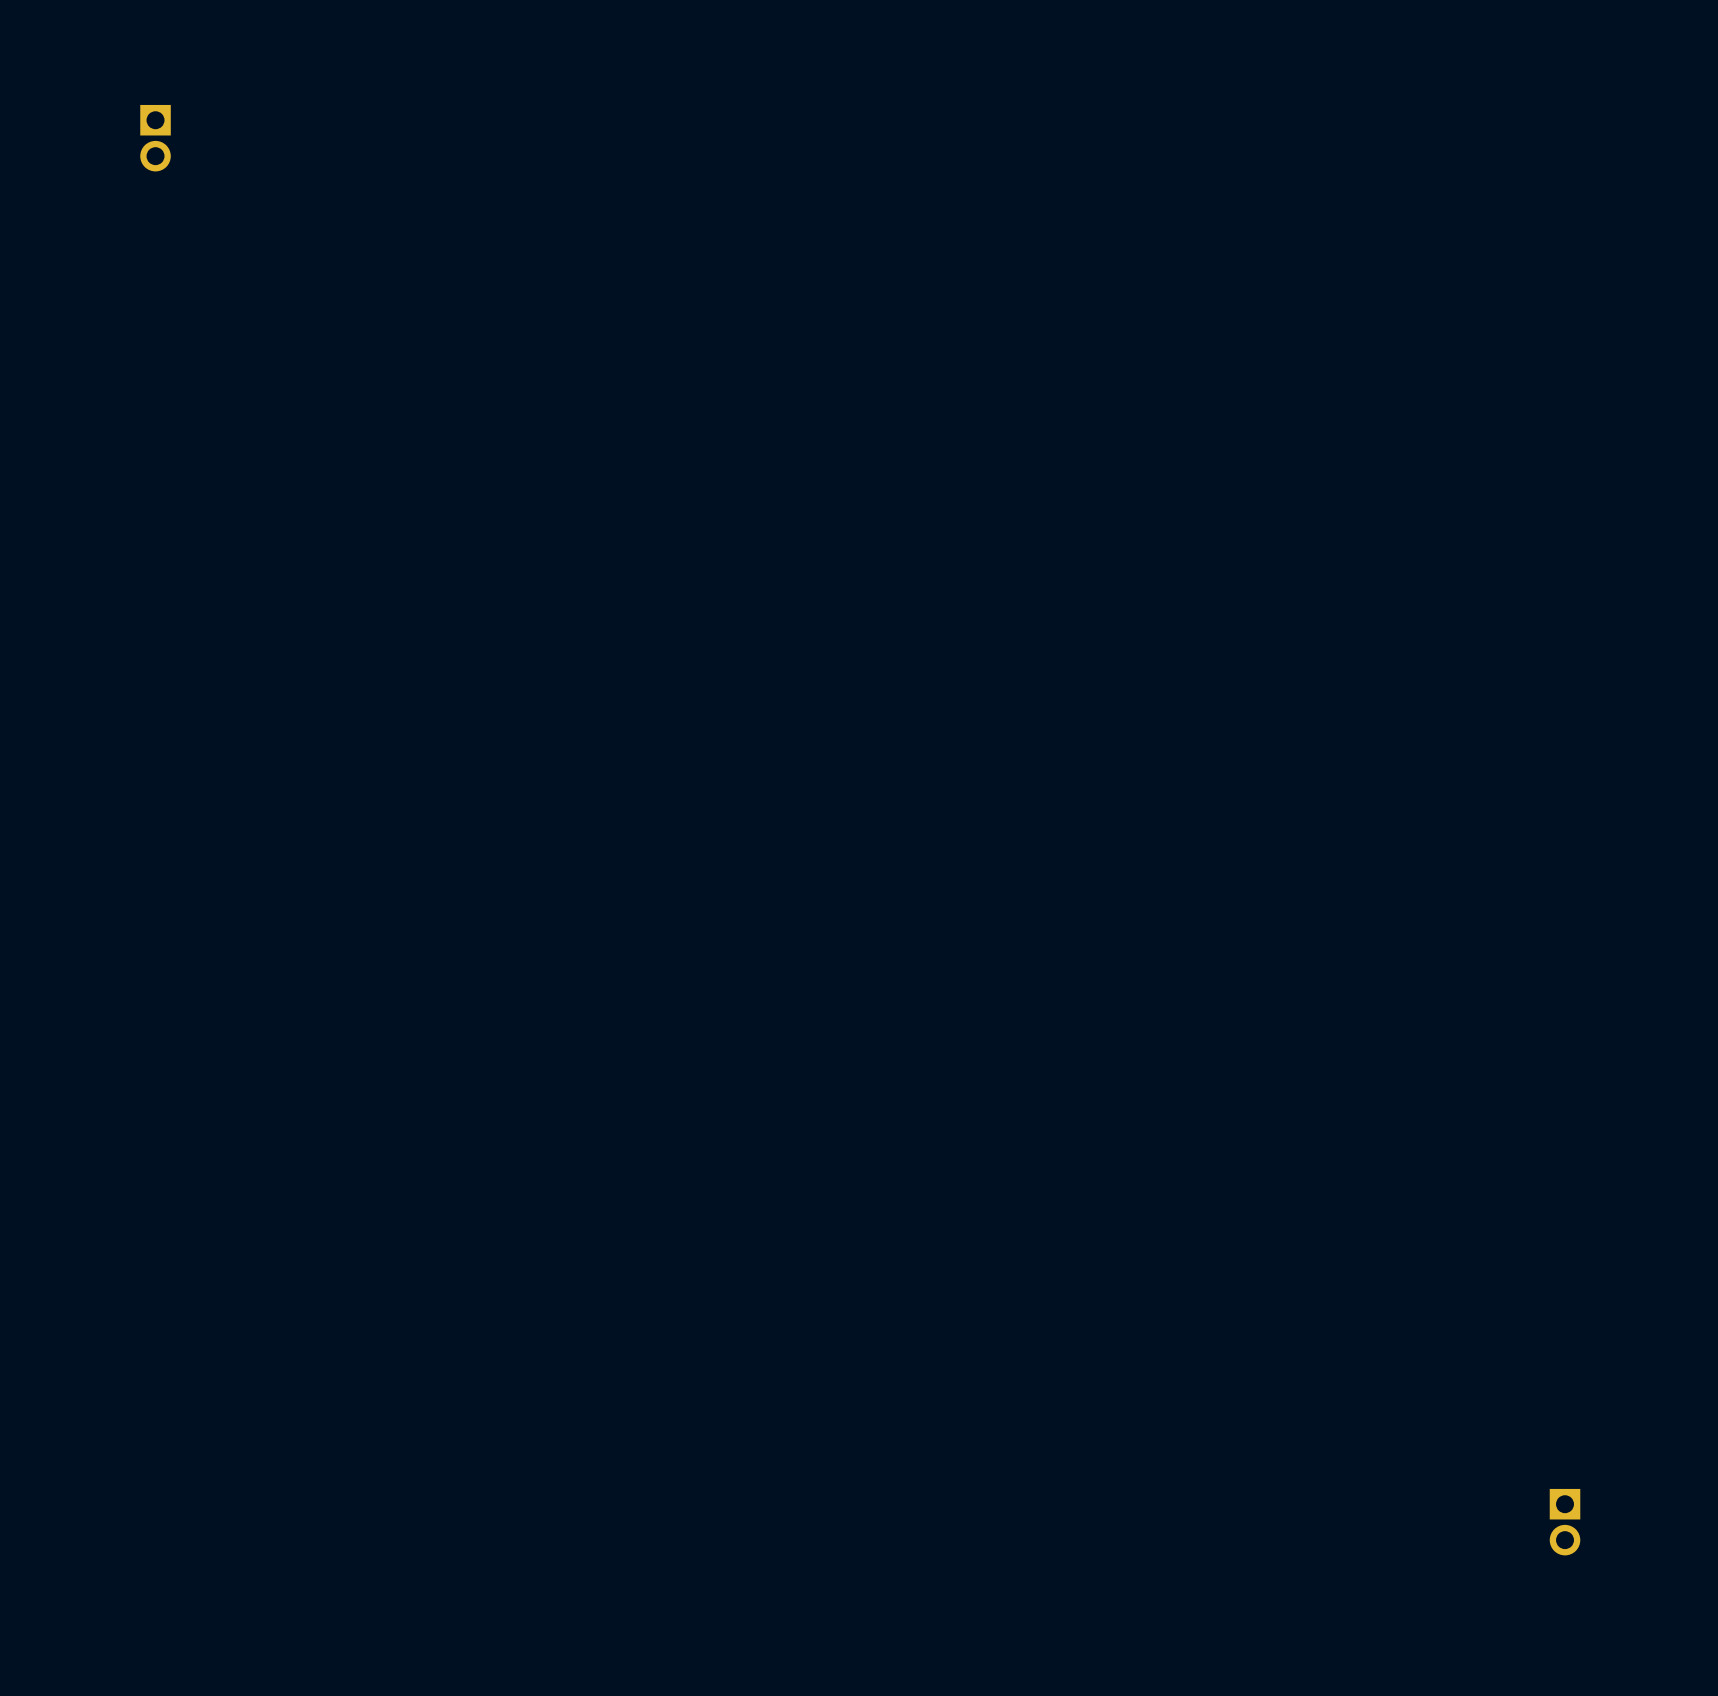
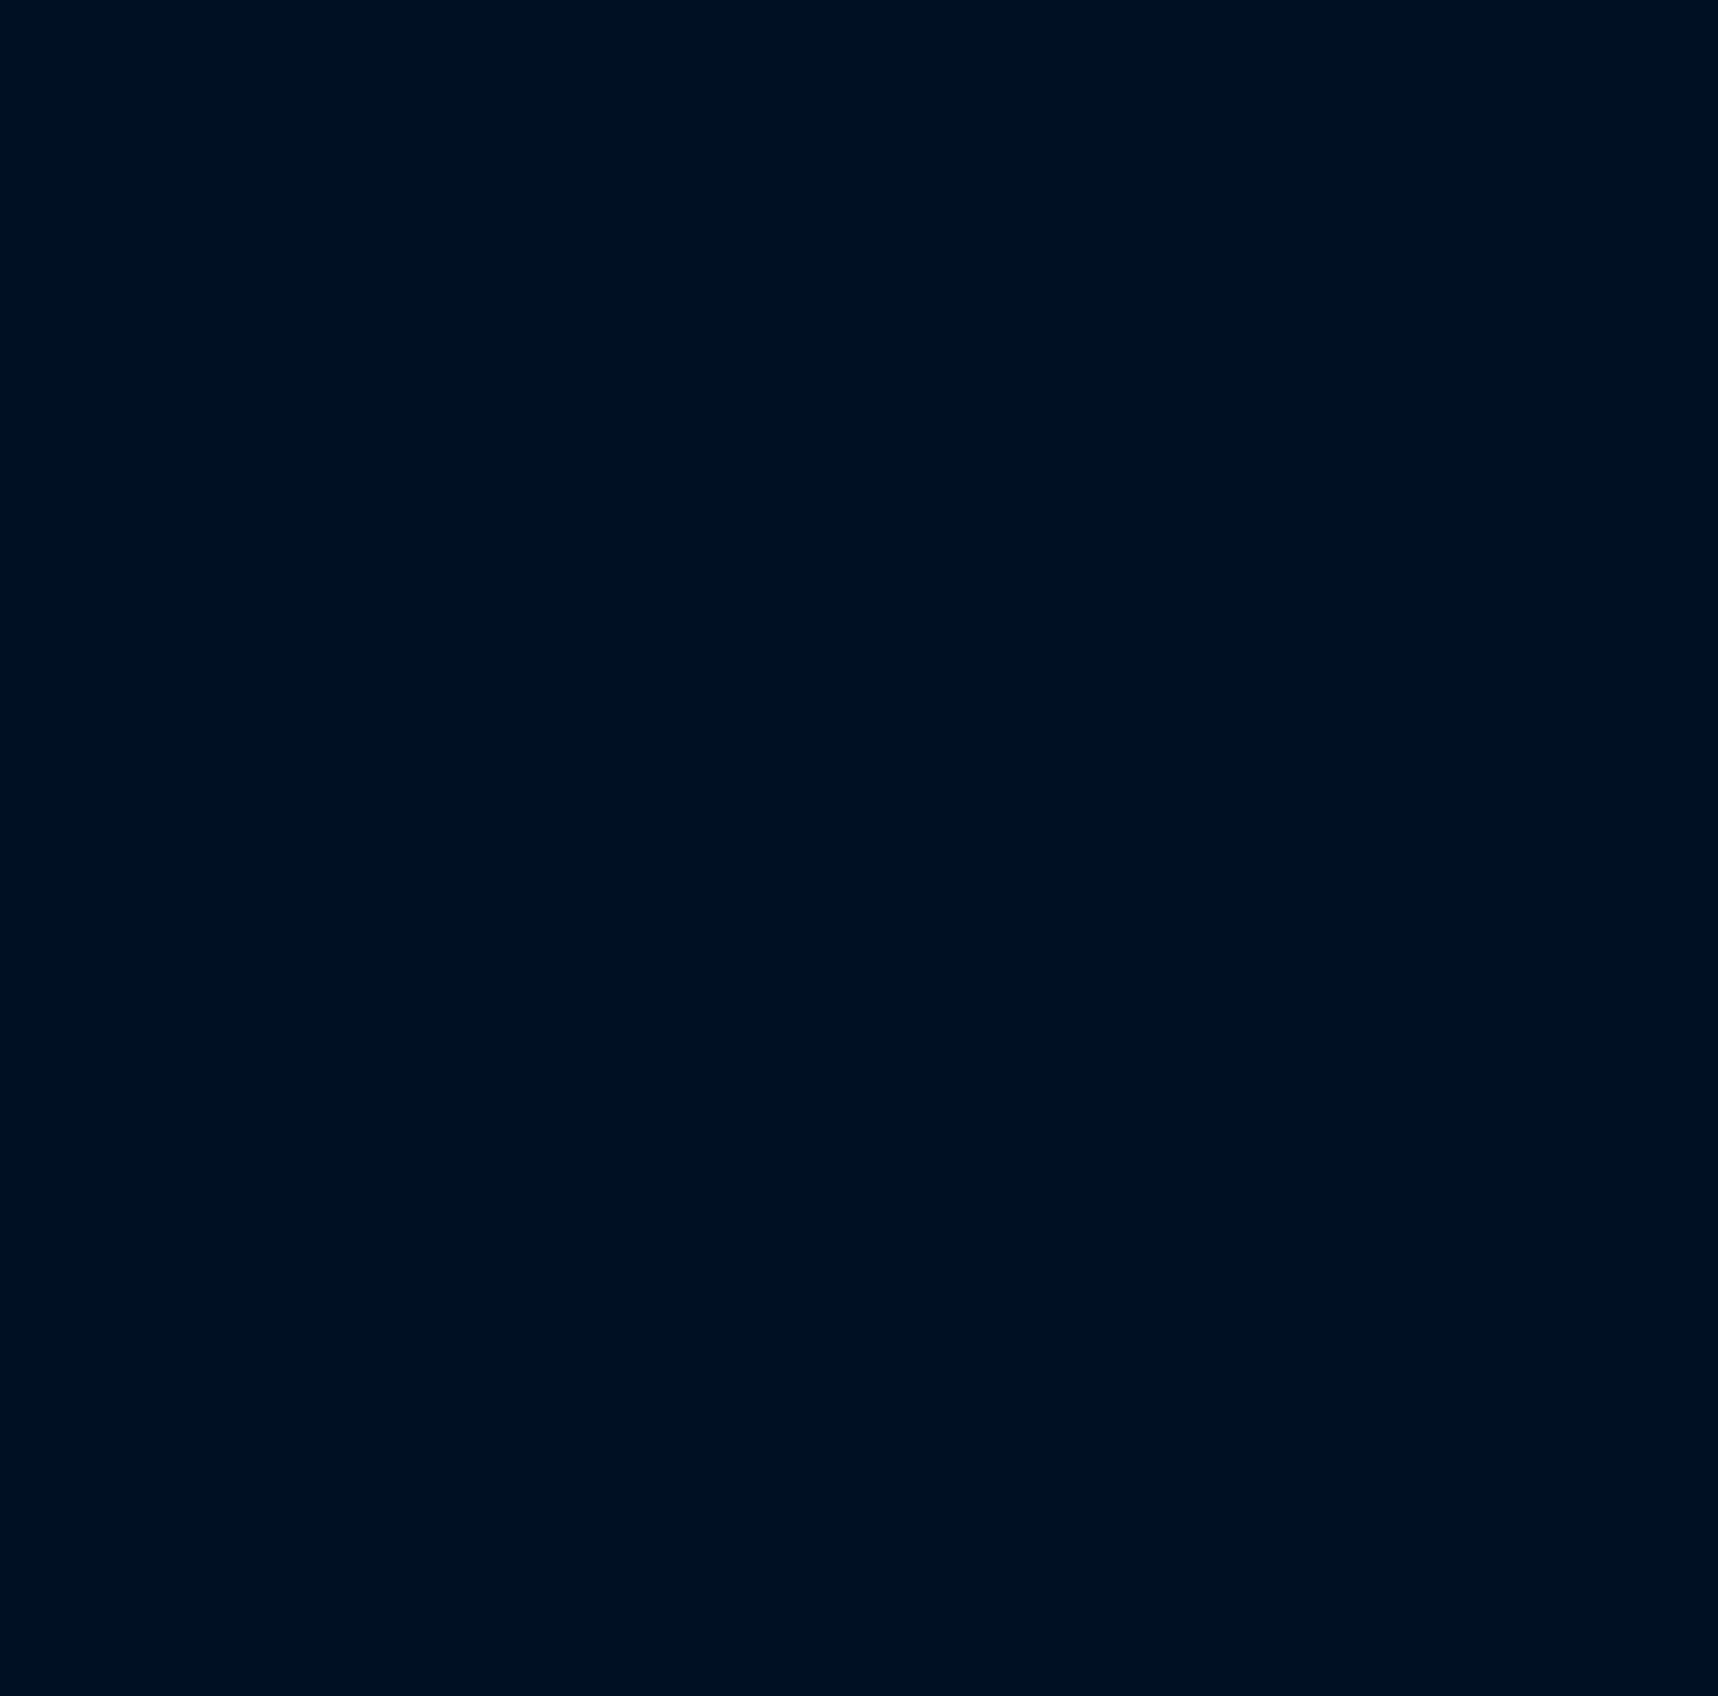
part: (155, 138) -> none
part: (1565, 1522) -> none

